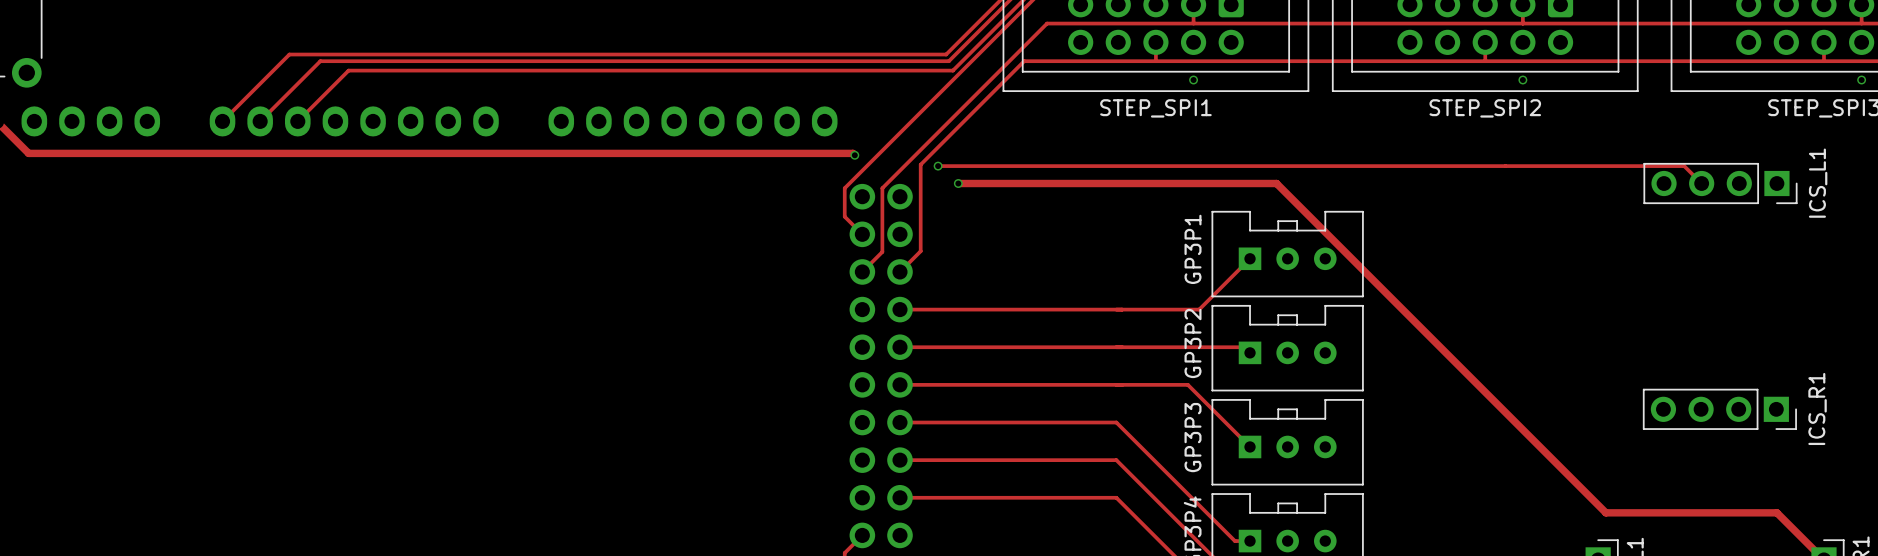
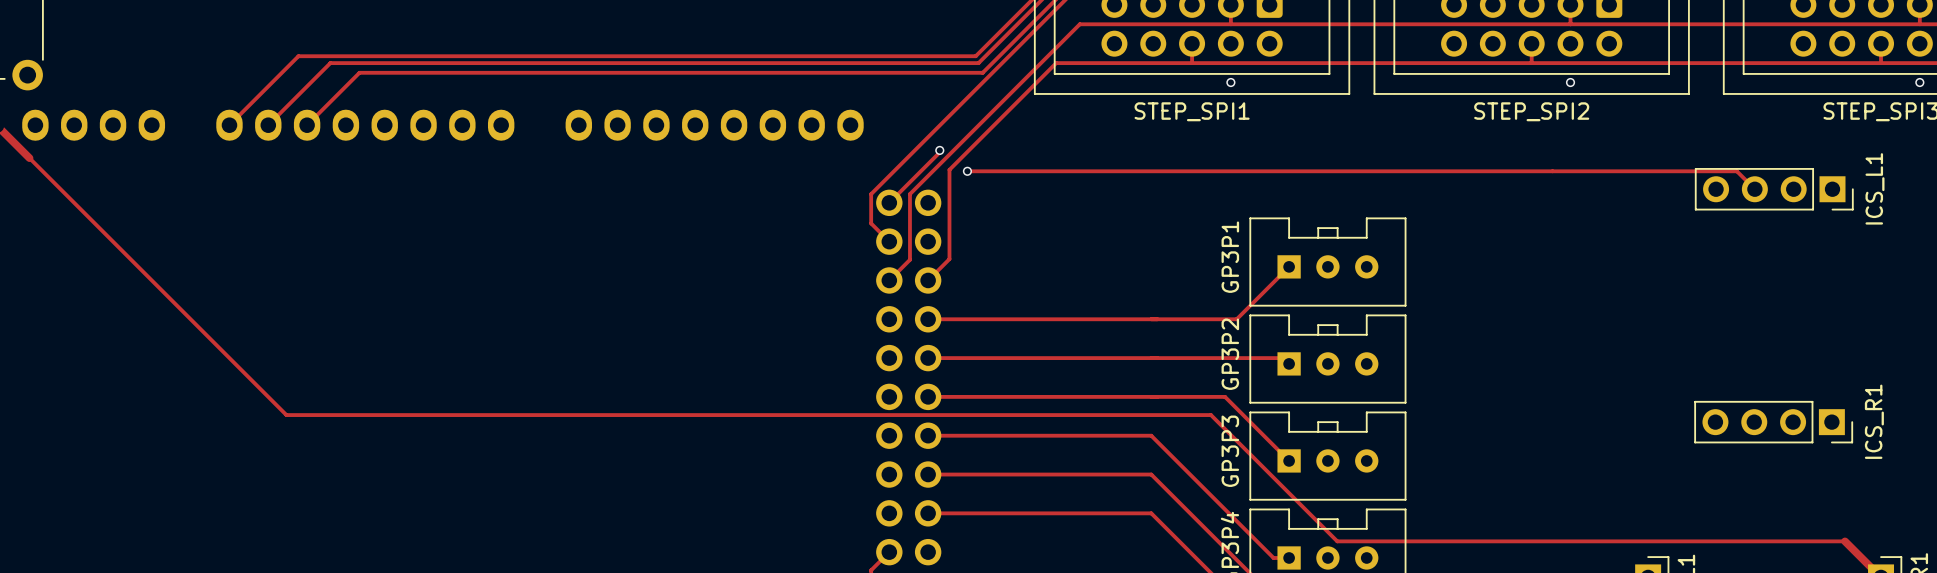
track: none -> (939, 150) (889, 202)
via: none -> (939, 150)
track: (28, 153) (852, 153) (854, 155) -> none
via: (854, 155) -> none
track: (958, 183) (1276, 183) (1605, 512) (1776, 512) (1789, 524) -> (29, 158) (286, 415) (1211, 415) (1337, 541) (1845, 541)
via: (958, 183) -> none

